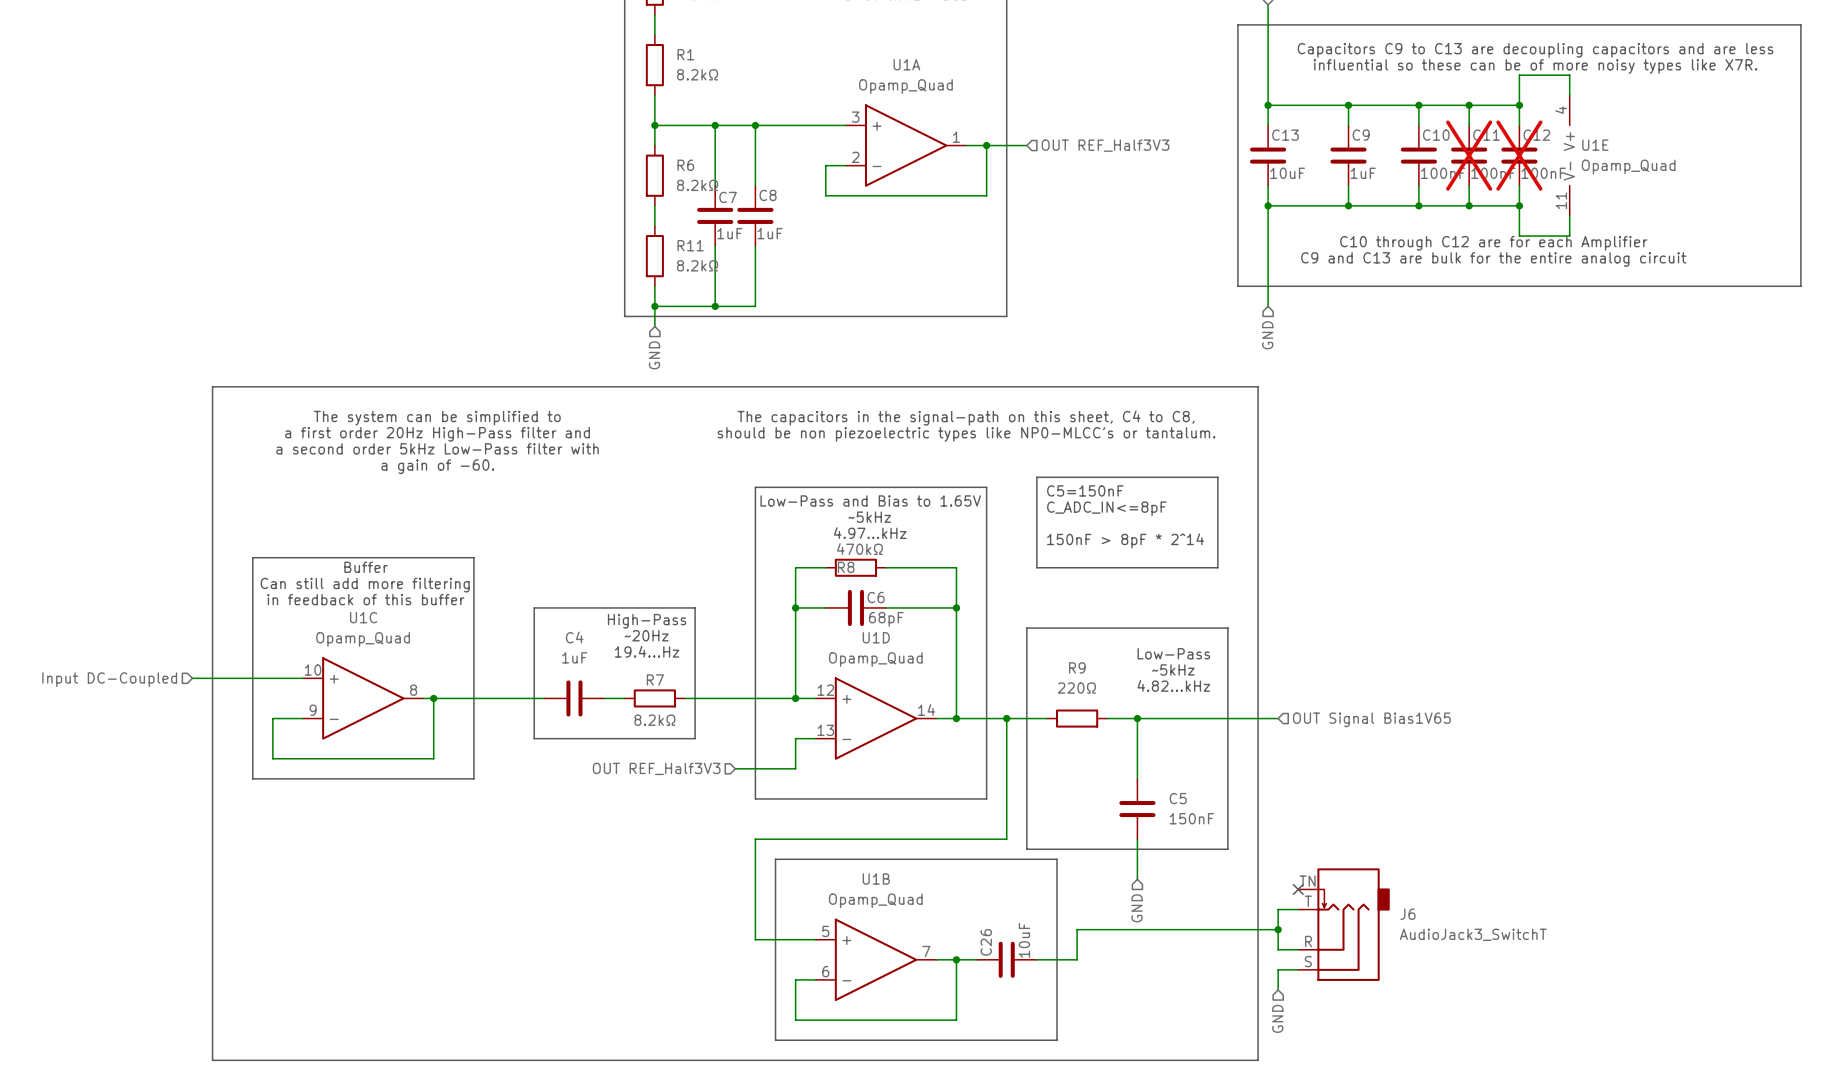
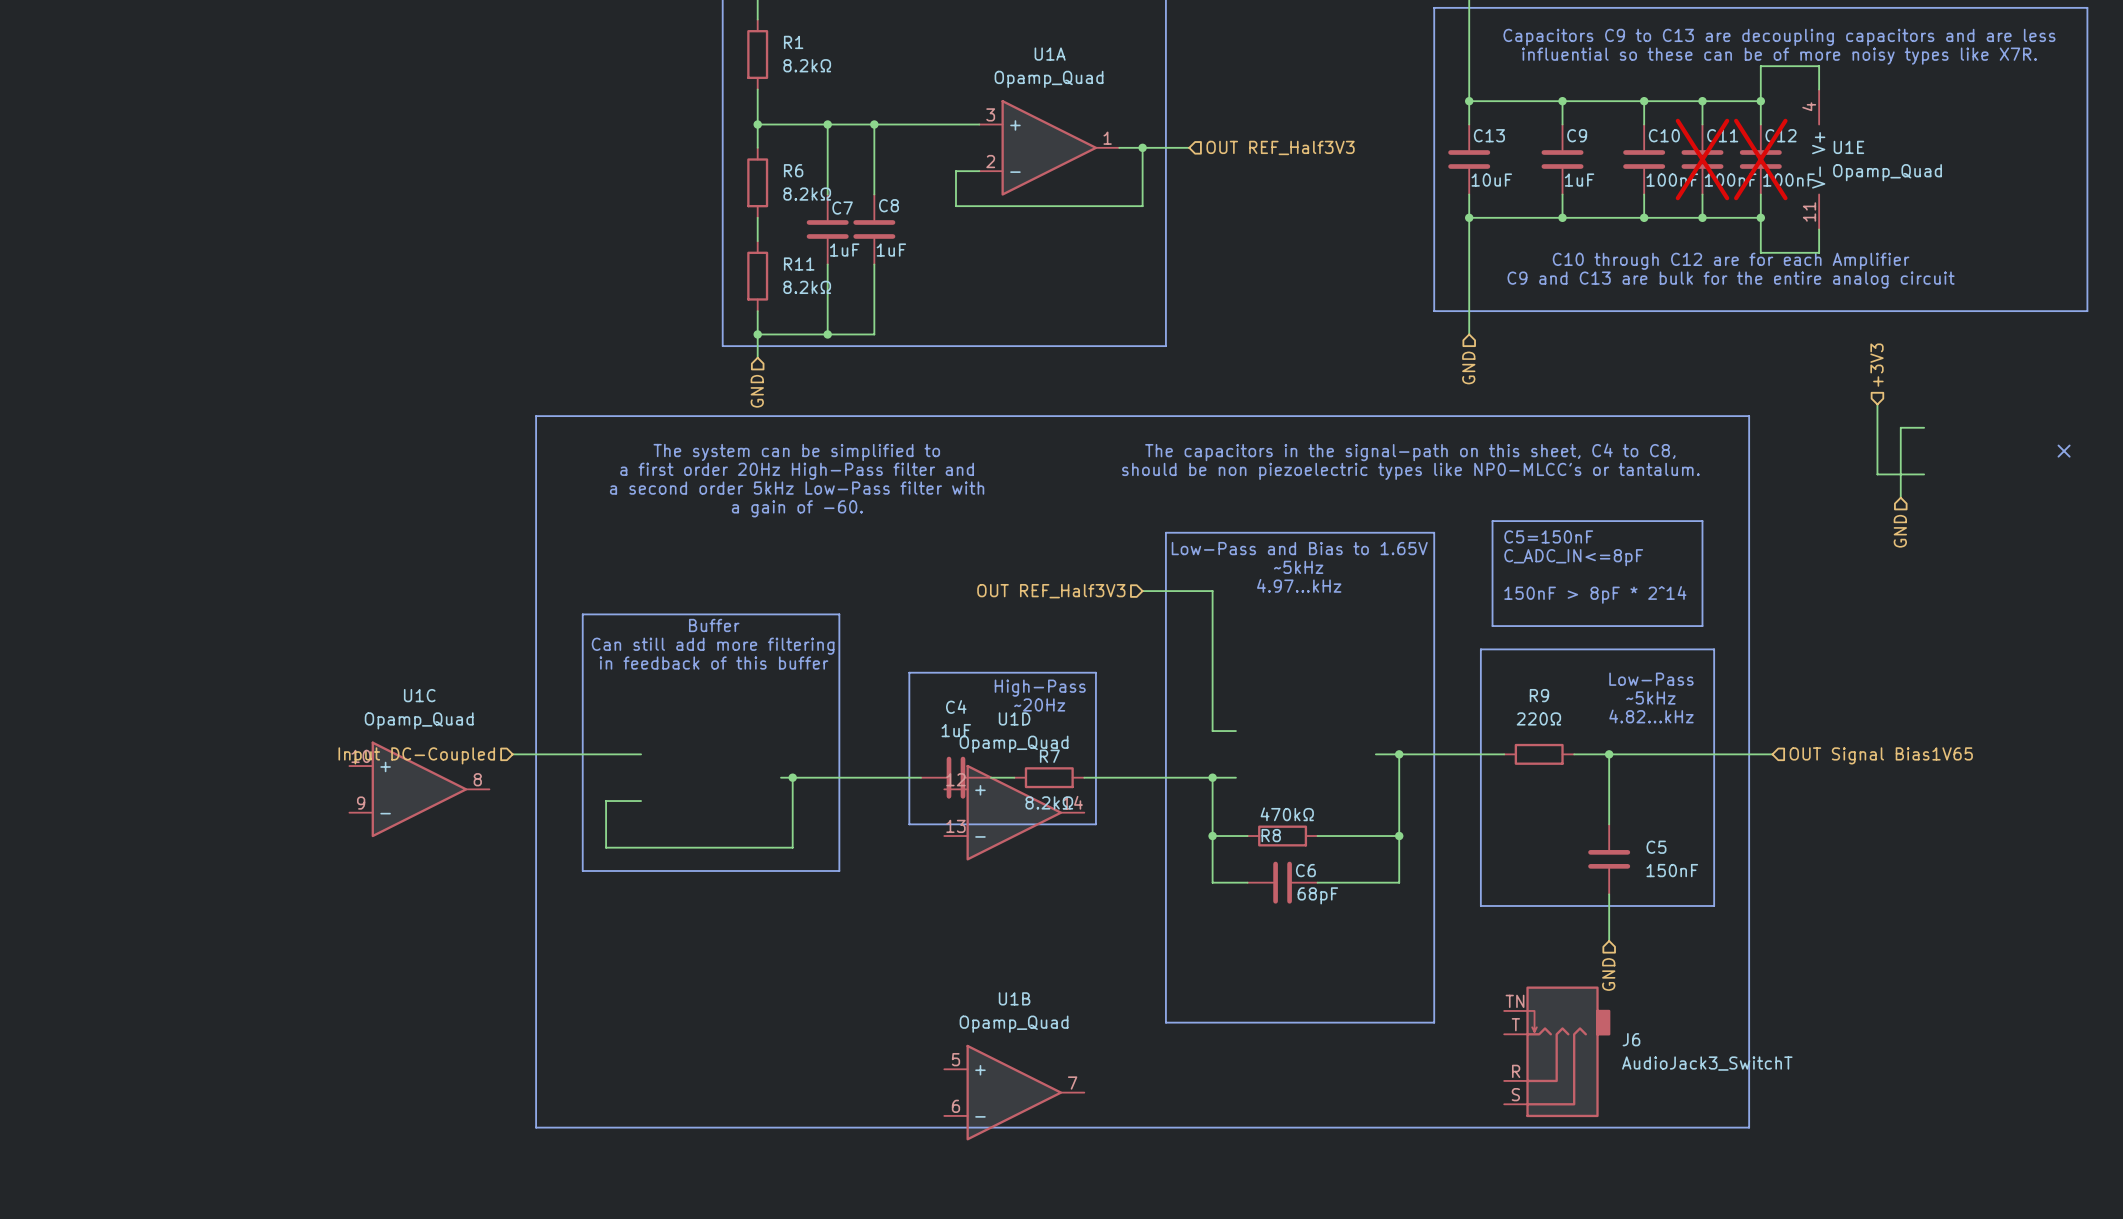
hierarchical label: none -> +3V3 (1877, 365)
wire: none -> (1877, 404) (1877, 474) (1924, 474)
line: (212, 386) (1258, 386) (1258, 1060) (212, 1060) (212, 386) -> (536, 416) (536, 1127) (1749, 1127) (1749, 416) (536, 416)
wire: none -> (1924, 427) (1900, 427) (1900, 497)
no-connect mark: none -> (2064, 451)
text: none -> The capacitors in the signal-path on this sheet, C4 to C8, (1410, 452)
text: none -> The system can be simplified to (796, 452)
text: The system can be simplified to (437, 418) -> none
text: The capacitors in the signal-path on this sheet, C4 to C8, (966, 418) -> none
text: none -> a first order 20Hz High-Pass filter and (797, 471)
text: none -> should be non piezoelectric types like NP0-MLCC's or tantalum. (1410, 471)
text: a first order 20Hz High-Pass filter and (437, 434) -> none
text: should be non piezoelectric types like NP0-MLCC's or tantalum. (966, 434) -> none
text: none -> a second order 5kHz Low-Pass filter with (797, 488)
text: a second order 5kHz Low-Pass filter with (437, 448) -> none
text: none -> a gain of -60. (797, 508)
text: a gain of -60. (437, 466) -> none
line: none -> (1492, 521) (1702, 521) (1702, 626) (1492, 626) (1492, 521)
hierarchical label: none -> GND (1900, 531)
line: (1036, 477) (1036, 567) (1217, 567) (1217, 477) -> (1200, 532) (1165, 532) (1165, 1022) (1434, 1022) (1434, 532) (1410, 532)
text: none -> C5=150nF (1548, 536)
line: (755, 487) (986, 487) (986, 798) (755, 798) (755, 487) -> none
text: C5=150nF (1085, 490) -> none
text: none -> Low-Pass and Bias to 1.65V (1299, 548)
text: none -> C_ADC_IN<=8pF (1573, 557)
text: Low-Pass and Bias to 1.65V (870, 500) -> none
text: none -> ~5kHz (1298, 567)
text: C_ADC_IN<=8pF (1106, 508) -> none
text: ~5kHz (869, 517) -> none
text: none -> 4.97...kHz (1299, 585)
hierarchical label: none -> OUT REF_Half3V3 (1051, 591)
wire: none -> (1142, 591) (1212, 591) (1212, 731) (1235, 731)
text: none -> 150nF > 8pF * 2^14 (1595, 594)
text: 4.97...kHz (870, 533) -> none
text: 150nF > 8pF * 2^14 (1125, 540) -> none
line: none -> (582, 614) (839, 614) (839, 871) (582, 871) (582, 614)
line: (252, 557) (473, 557) (473, 778) (252, 778) (252, 557) -> none
text: none -> Buffer (714, 625)
text: Buffer (366, 567) -> none
wire: (825, 567) (795, 567) (795, 698) -> none
R8 position: (855, 567) -> (1282, 836)
wire: (886, 567) (956, 567) (956, 718) -> none
text: none -> Can still add more filtering (713, 646)
line: none -> (1480, 649) (1714, 649) (1714, 905) (1480, 905) (1480, 649)
text: Can still add more filtering (365, 585) -> none
text: none -> in feedback of this buffer (713, 663)
line: none -> (909, 672) (1095, 672) (1095, 824) (909, 824) (909, 672)
text: in feedback of this buffer (365, 599) -> none
text: none -> Low-Pass (1651, 679)
line: (534, 607) (695, 607) (695, 738) (534, 738) (534, 607) -> none
wire: (795, 607) (825, 607) -> none
junction: (795, 607) -> none
C6 position: (855, 607) -> (1282, 882)
wire: (886, 607) (956, 607) -> none
junction: (956, 607) -> none
text: none -> High-Pass (1040, 688)
text: none -> ~5kHz (1650, 697)
text: High-Pass (647, 621) -> none
text: none -> ~20Hz (1039, 704)
line: (1026, 628) (1227, 628) (1227, 849) (1026, 849) (1026, 628) -> none
text: ~20Hz (646, 635) -> none
text: none -> 4.82...kHz (1651, 716)
text: 19.4...Hz (647, 651) -> none
text: Low-Pass (1173, 653) -> none
wire: none -> (512, 754) (641, 754)
wire: none -> (1375, 754) (1504, 754)
junction: none -> (1399, 754)
wire: none -> (1574, 754) (1772, 754)
wire: none -> (1609, 754) (1609, 824)
junction: none -> (1609, 754)
hierarchical label: none -> Input DC-Coupled (416, 755)
text: ~5kHz (1173, 669) -> none
hierarchical label: none -> OUT Signal Bias1V65 (1881, 755)
wire: (192, 678) (303, 678) -> none
hierarchical label: Input DC-Coupled (109, 679) -> none
text: 4.82...kHz (1173, 685) -> none
wire: none -> (781, 777) (921, 777)
wire: none -> (792, 777) (792, 847) (606, 847) (606, 801) (641, 801)
junction: none -> (792, 777)
wire: none -> (990, 777) (1014, 777)
wire: none -> (1084, 777) (1235, 777)
wire: none -> (1212, 777) (1212, 882) (1247, 882)
junction: none -> (1212, 777)
wire: (423, 698) (544, 698) -> none
wire: (433, 698) (433, 758) (272, 758) (272, 718) (303, 718) -> none
junction: (433, 698) -> none
C4 position: (574, 698) -> (955, 777)
wire: (604, 698) (624, 698) -> none
R7 position: (654, 698) -> (1049, 777)
wire: (685, 698) (815, 698) -> none
junction: (795, 698) -> none
wire: (936, 718) (1046, 718) -> none
junction: (956, 718) -> none
wire: (1006, 718) (1006, 839) (755, 839) (755, 939) (815, 939) -> none
junction: (1006, 718) -> none
R9 position: (1077, 718) -> (1539, 754)
wire: (1107, 718) (1278, 718) -> none
wire: (1137, 718) (1137, 778) -> (1399, 754) (1399, 882) (1317, 882)
junction: (1137, 718) -> none
hierarchical label: OUT Signal Bias1V65 (1371, 719) -> none
wire: (815, 738) (795, 738) (795, 768) (735, 768) -> none
wire: none -> (1212, 836) (1247, 836)
junction: none -> (1212, 836)
wire: none -> (1317, 836) (1399, 836)
junction: none -> (1399, 836)
hierarchical label: OUT REF_Half3V3 (656, 768) -> none
wire: none -> (1609, 894) (1609, 940)
C5 position: (1137, 809) -> (1609, 859)
wire: (1137, 839) (1137, 879) -> none
hierarchical label: none -> GND (1608, 974)
line: (775, 859) (1056, 859) (1056, 1040) (775, 1040) (775, 859) -> none
no-connect mark: (1298, 889) -> none
hierarchical label: GND (1137, 908) -> none
wire: (1298, 909) (1278, 909) (1278, 949) (1298, 949) -> none
wire: (1278, 929) (1077, 929) (1077, 959) (1036, 959) -> none
junction: (1278, 929) -> none
wire: (936, 959) (976, 959) -> none
wire: (956, 959) (956, 1020) (795, 1020) (795, 979) (815, 979) -> none
junction: (956, 959) -> none
C26: 10uF (1006, 959) -> none
wire: (1298, 969) (1278, 969) (1278, 989) -> none
hierarchical label: GND (1277, 1018) -> none

